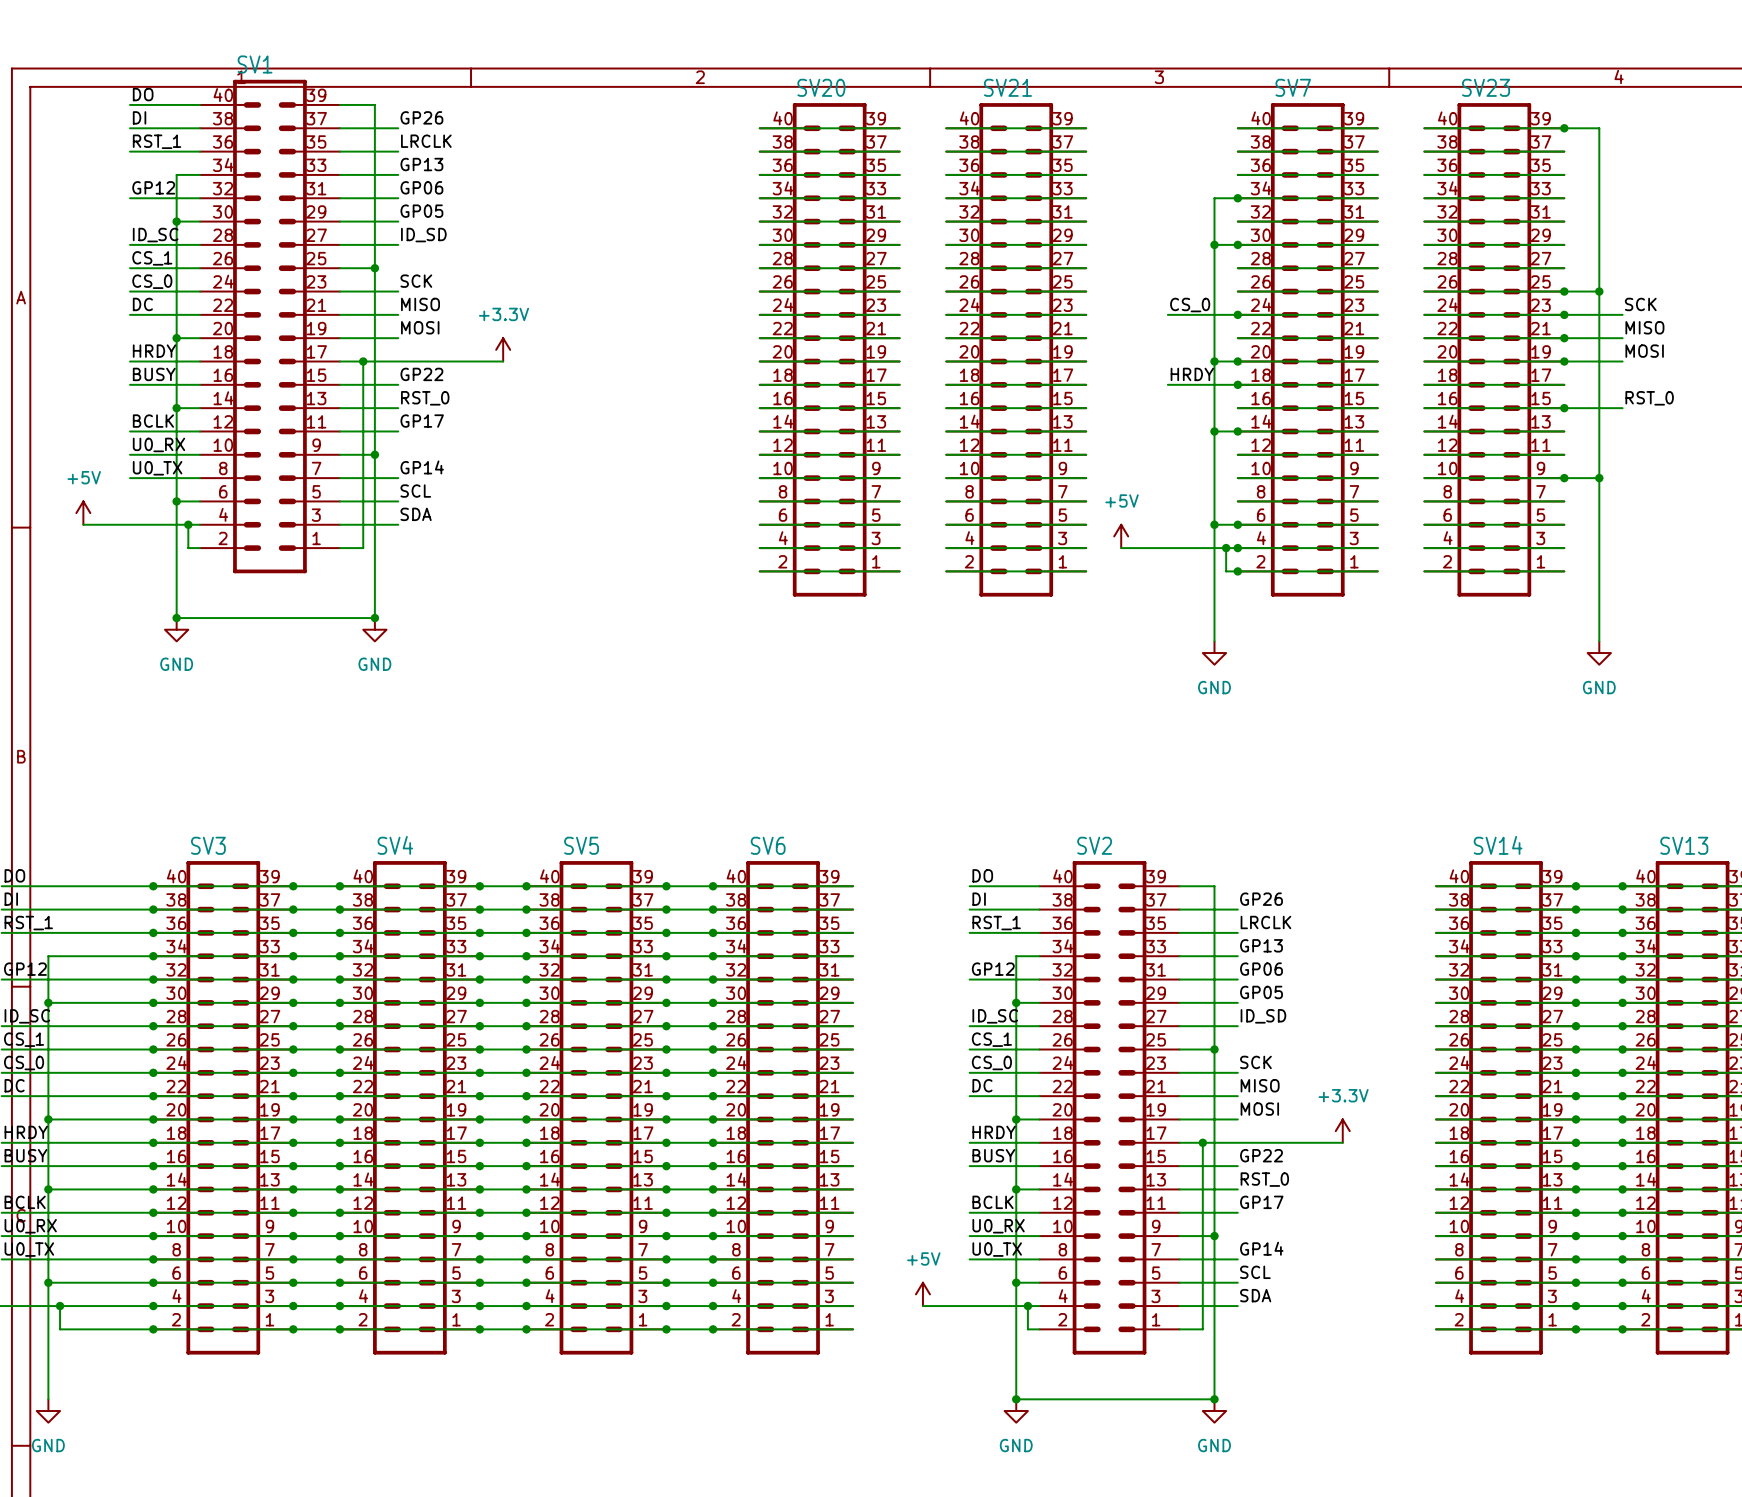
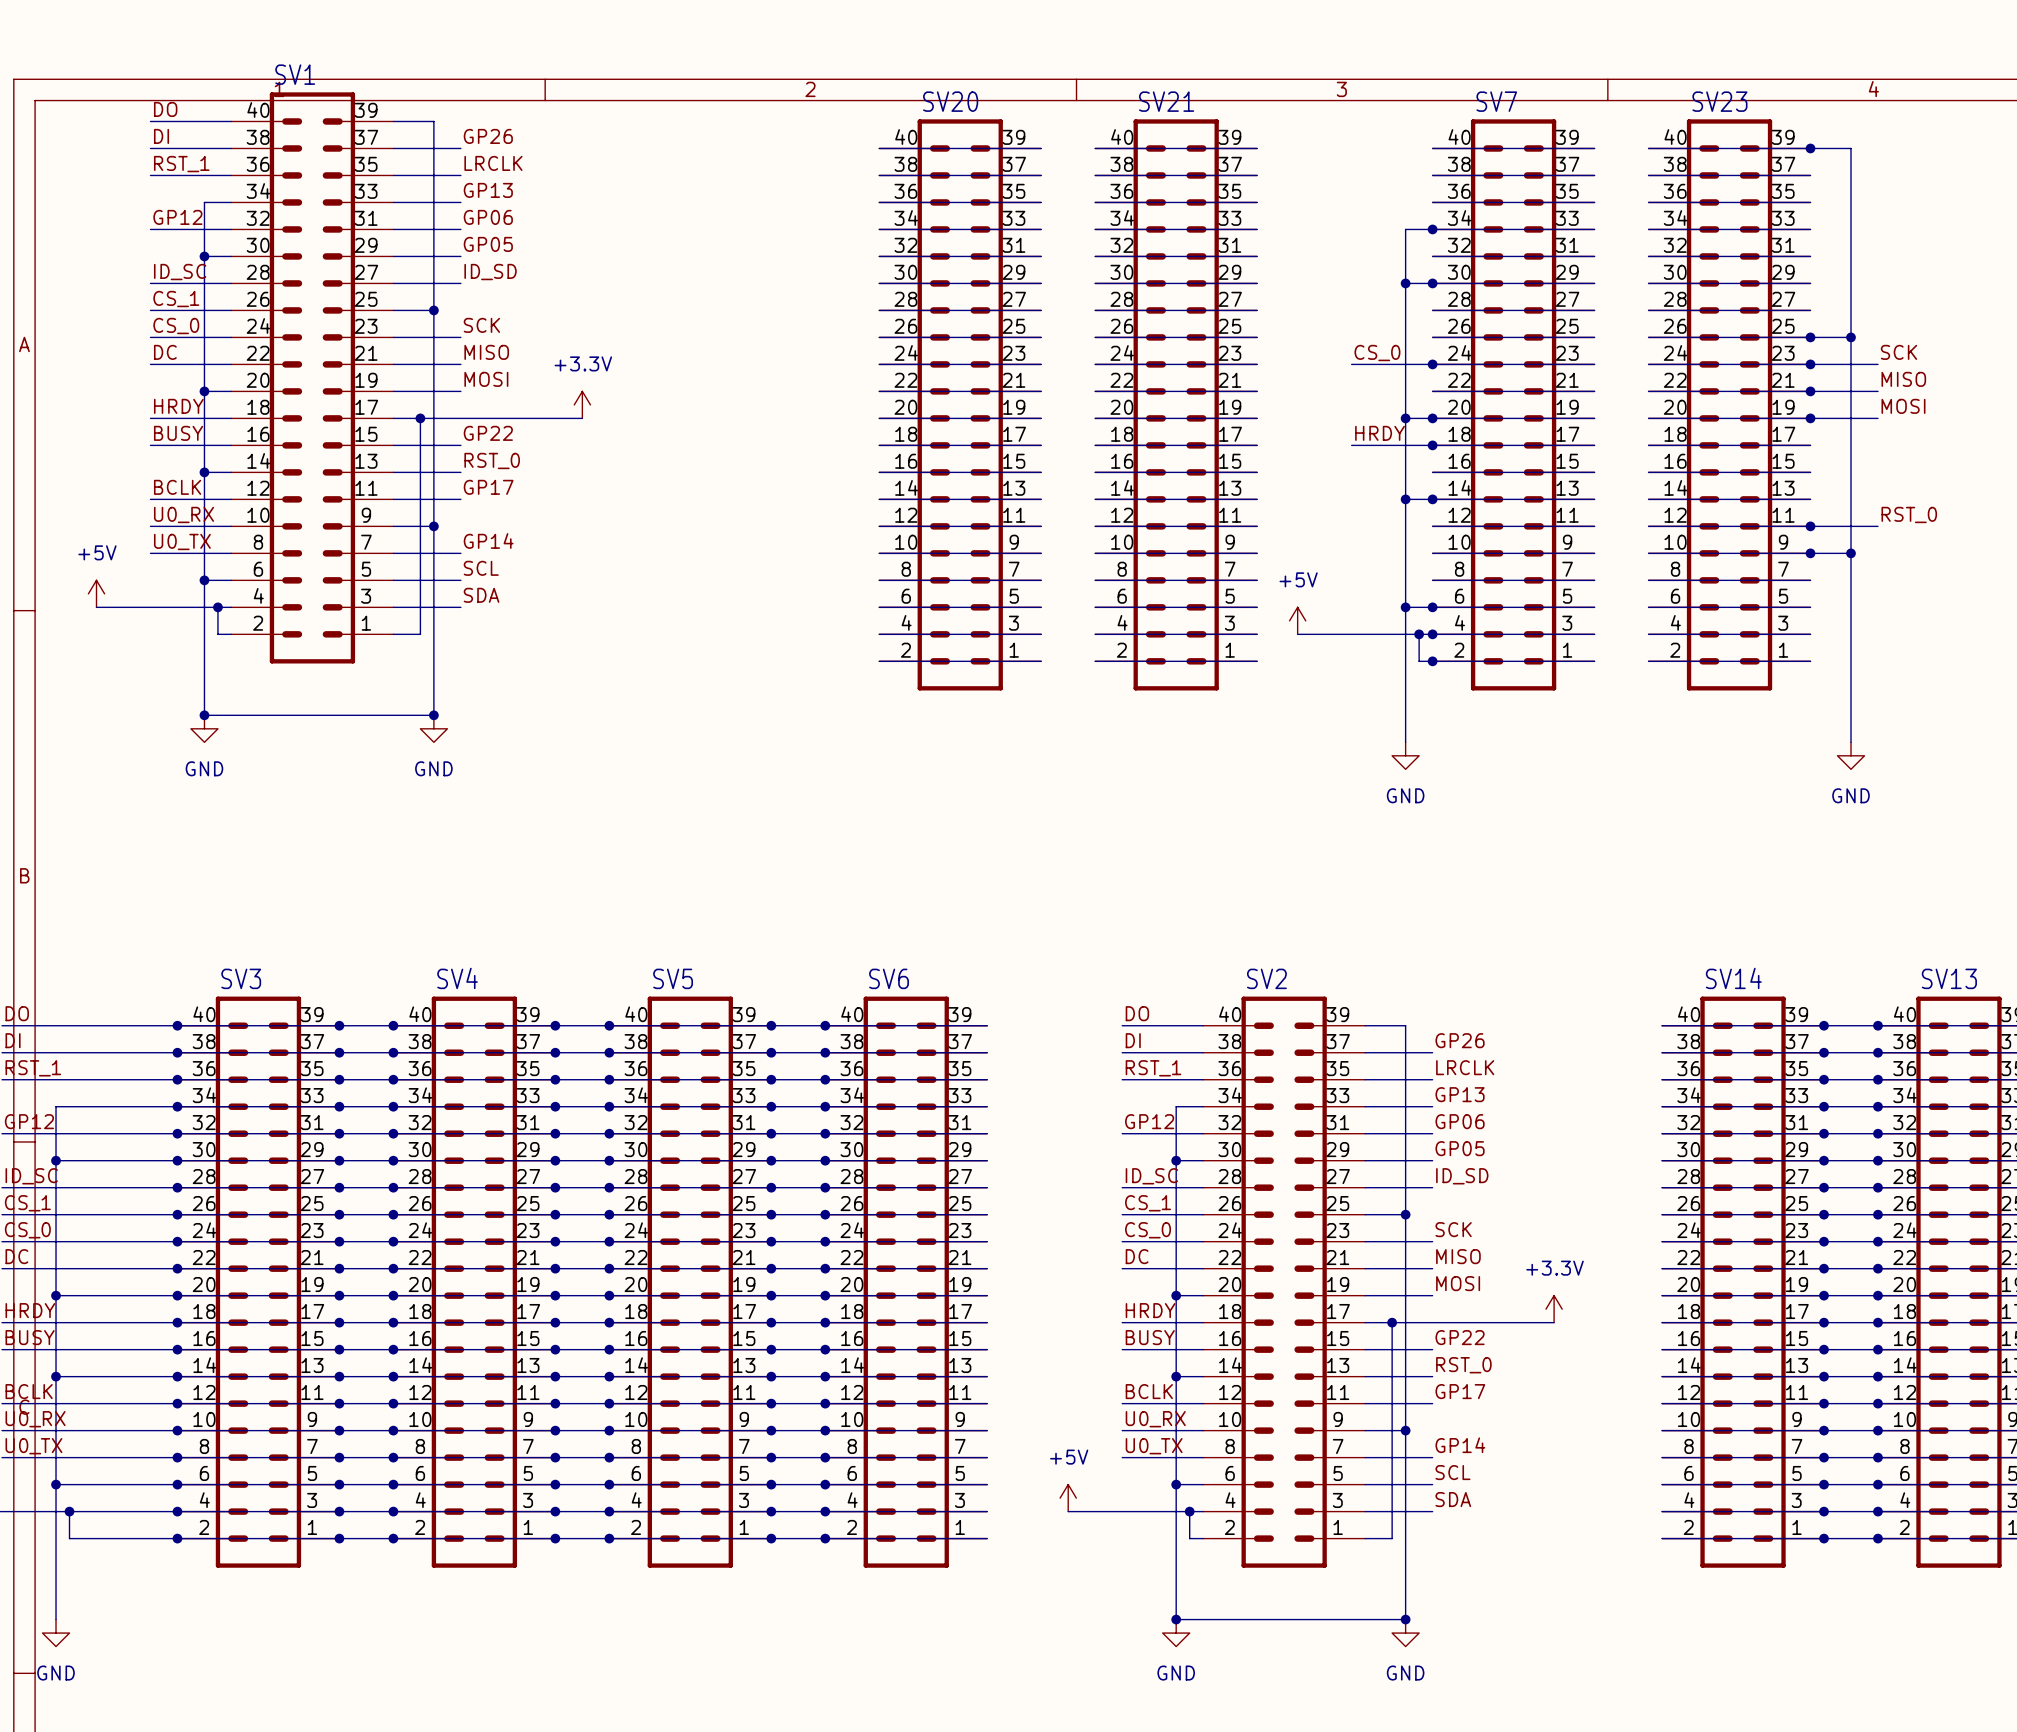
label position: RST_0 (1649, 398) -> RST_0 (1909, 514)
wire: (1564, 408) (1622, 408) -> (1810, 526) (1877, 526)
junction position: (1564, 408) -> (1810, 526)

